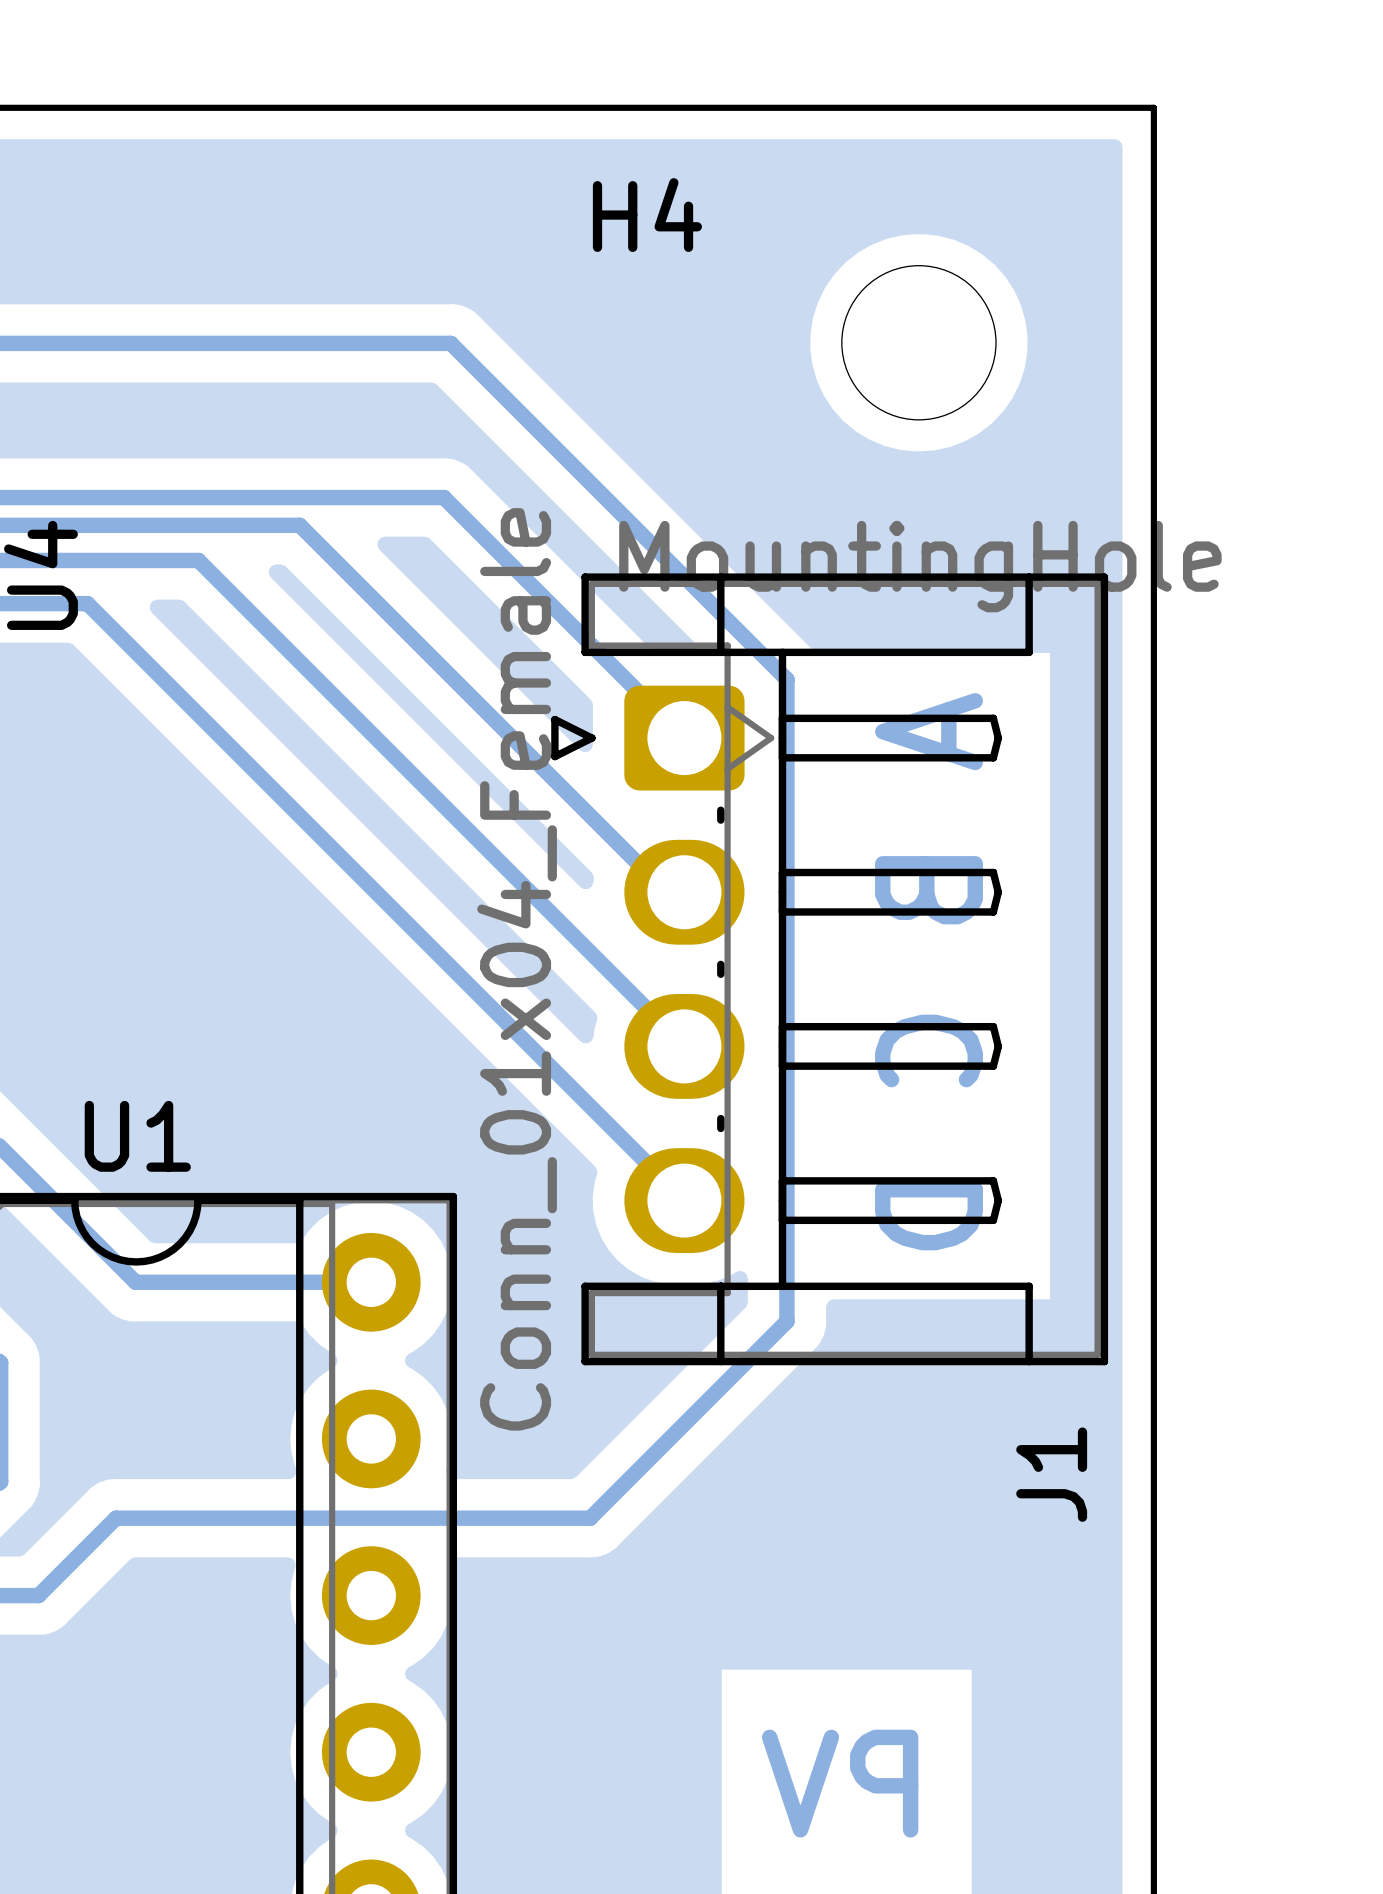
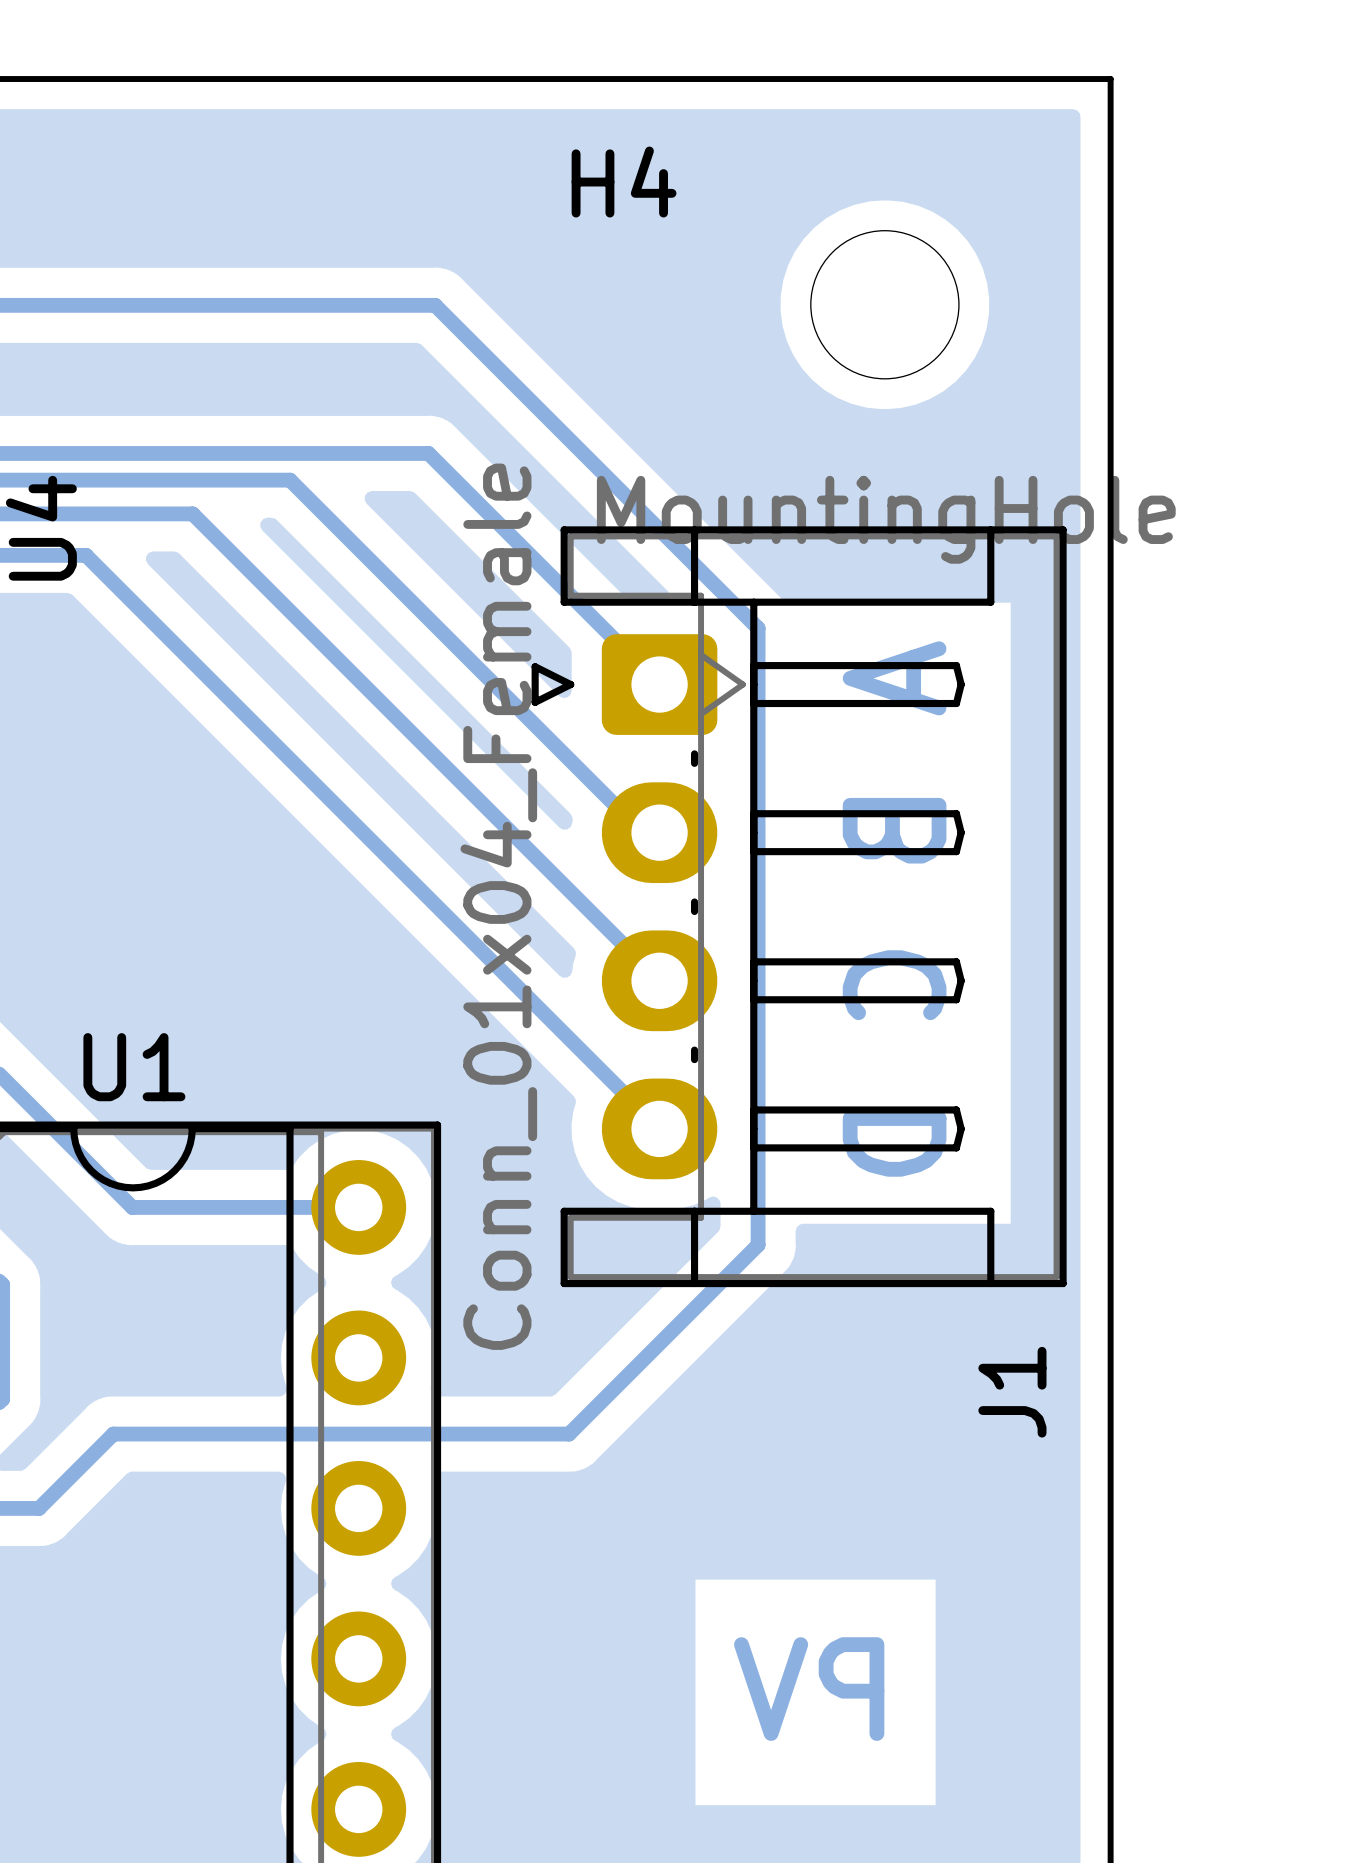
J1 footprint: [551, 573, 1109, 1366] -> [531, 526, 1067, 1288]

